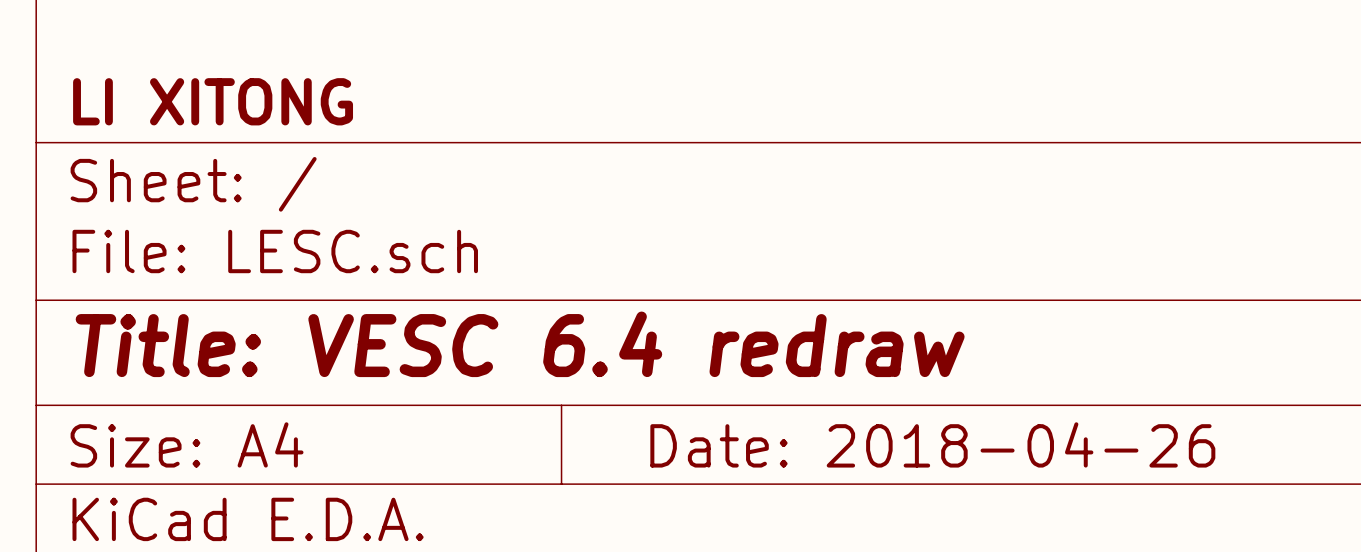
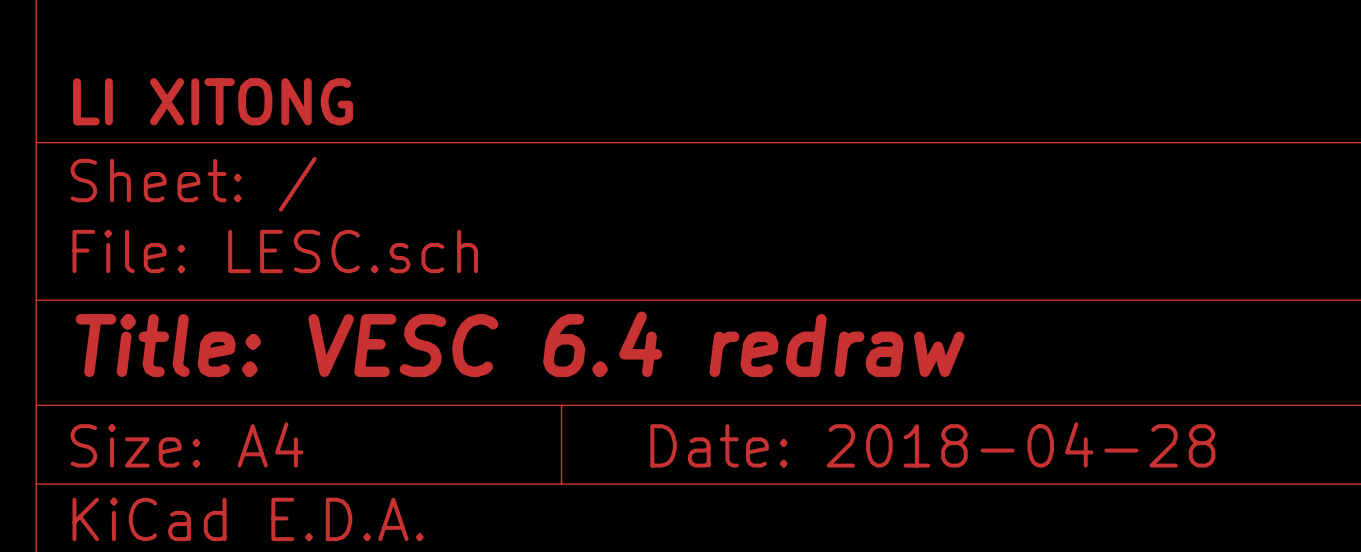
title block: Date: 2018-04-26 (932, 444) -> Date: 2018-04-28 (932, 444)

